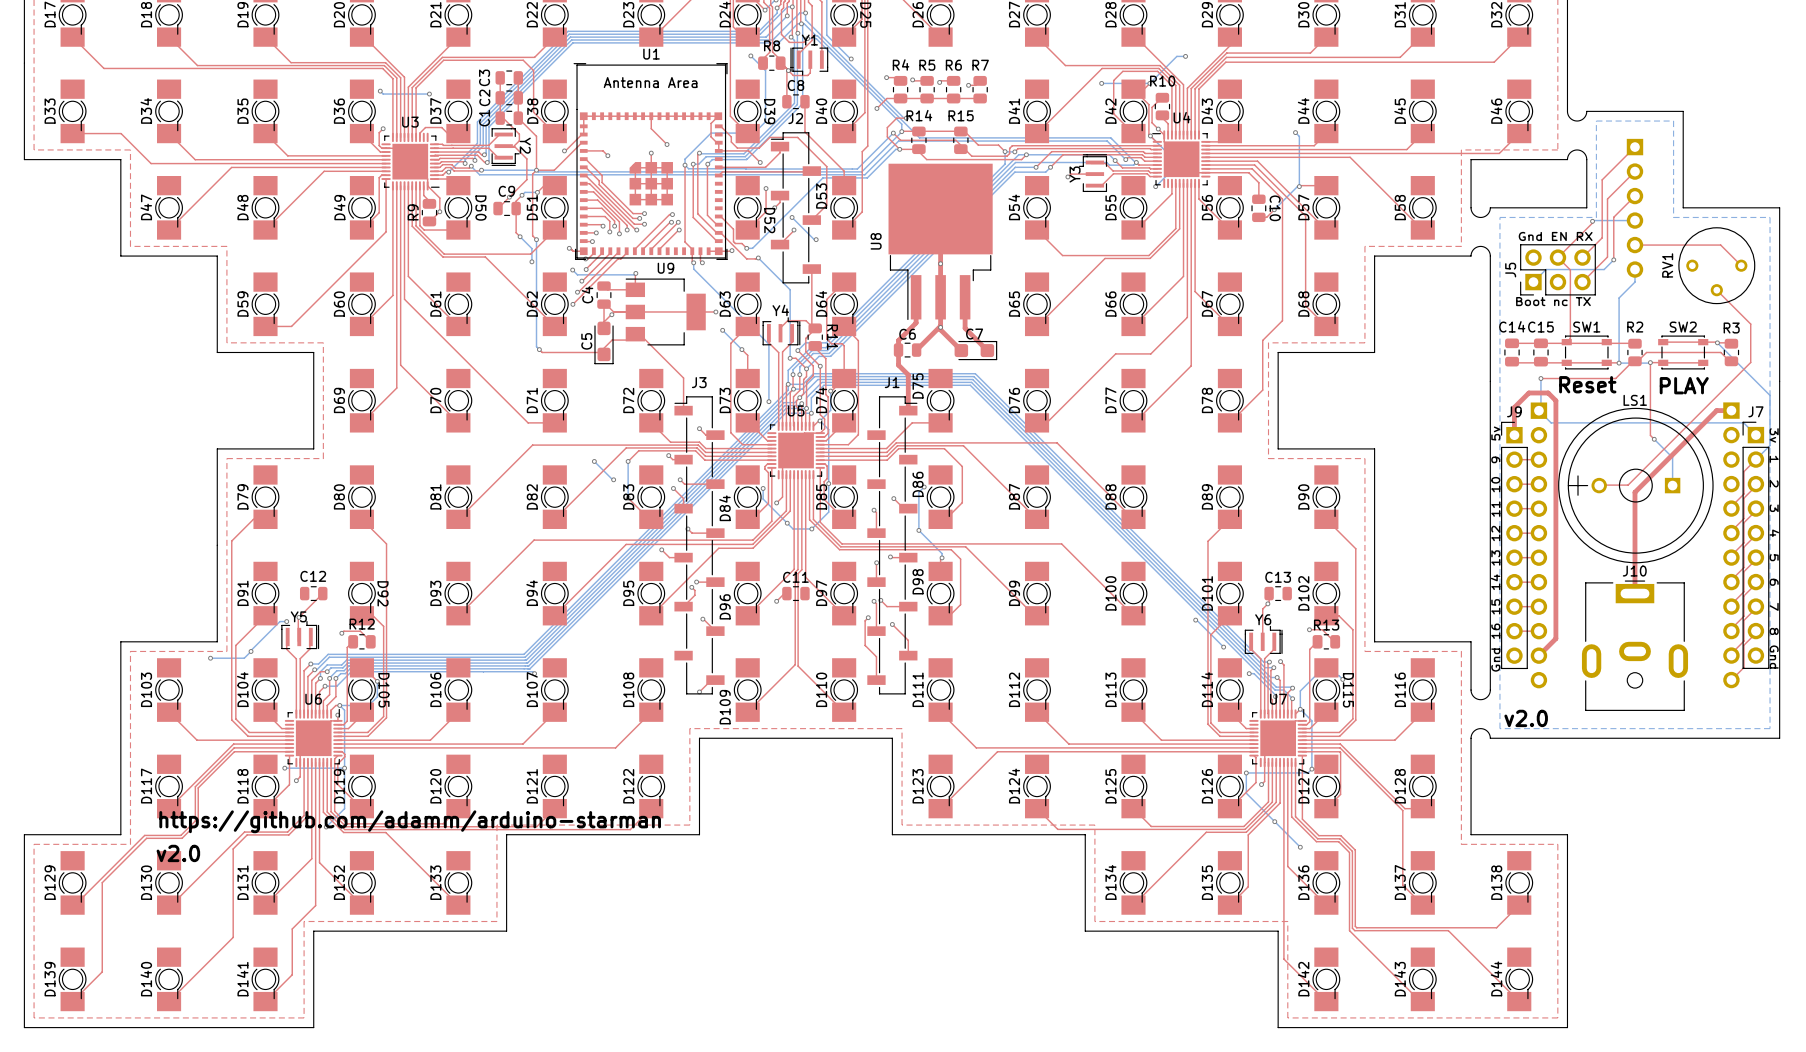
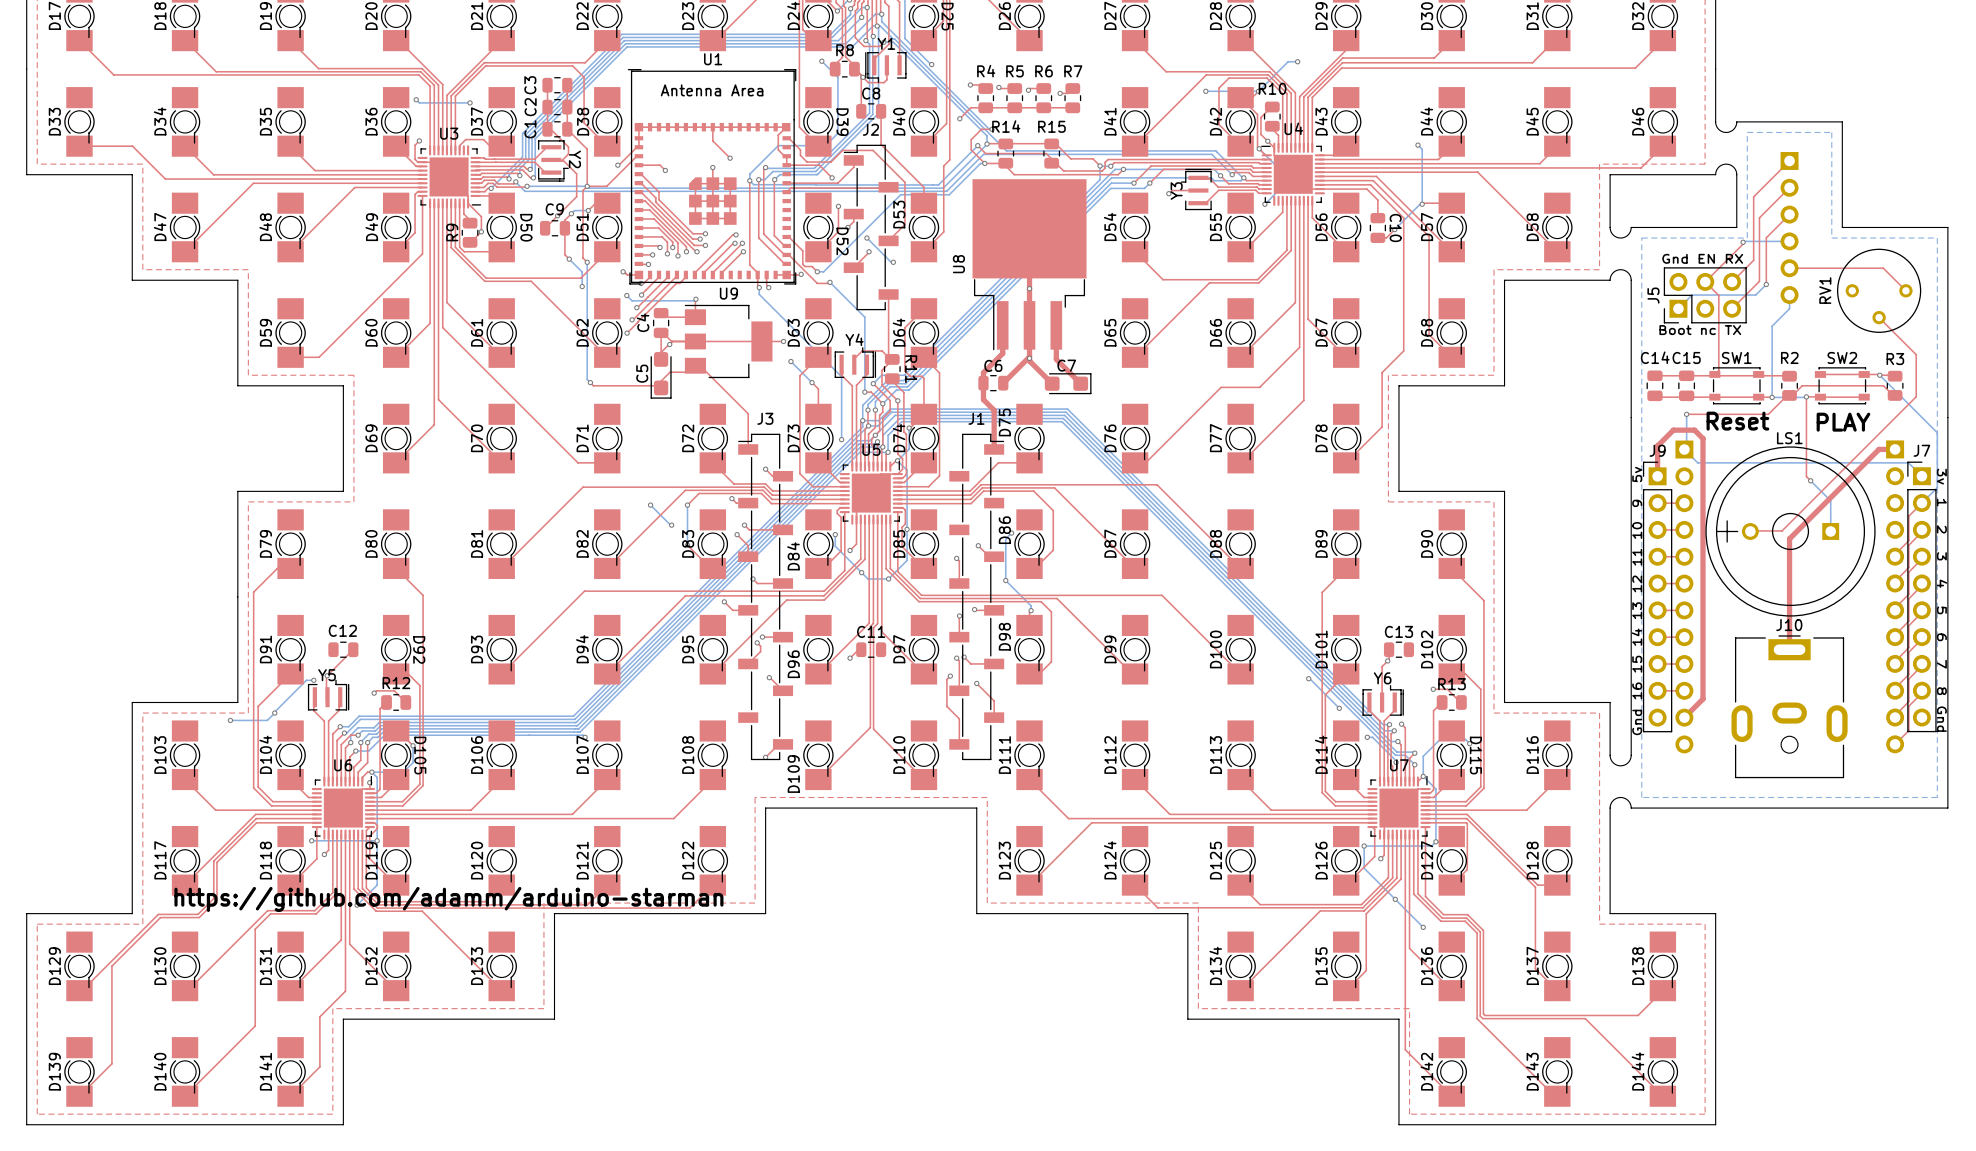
text: v2.0 (1526, 718) -> none
text: v2.0 (178, 853) -> none

